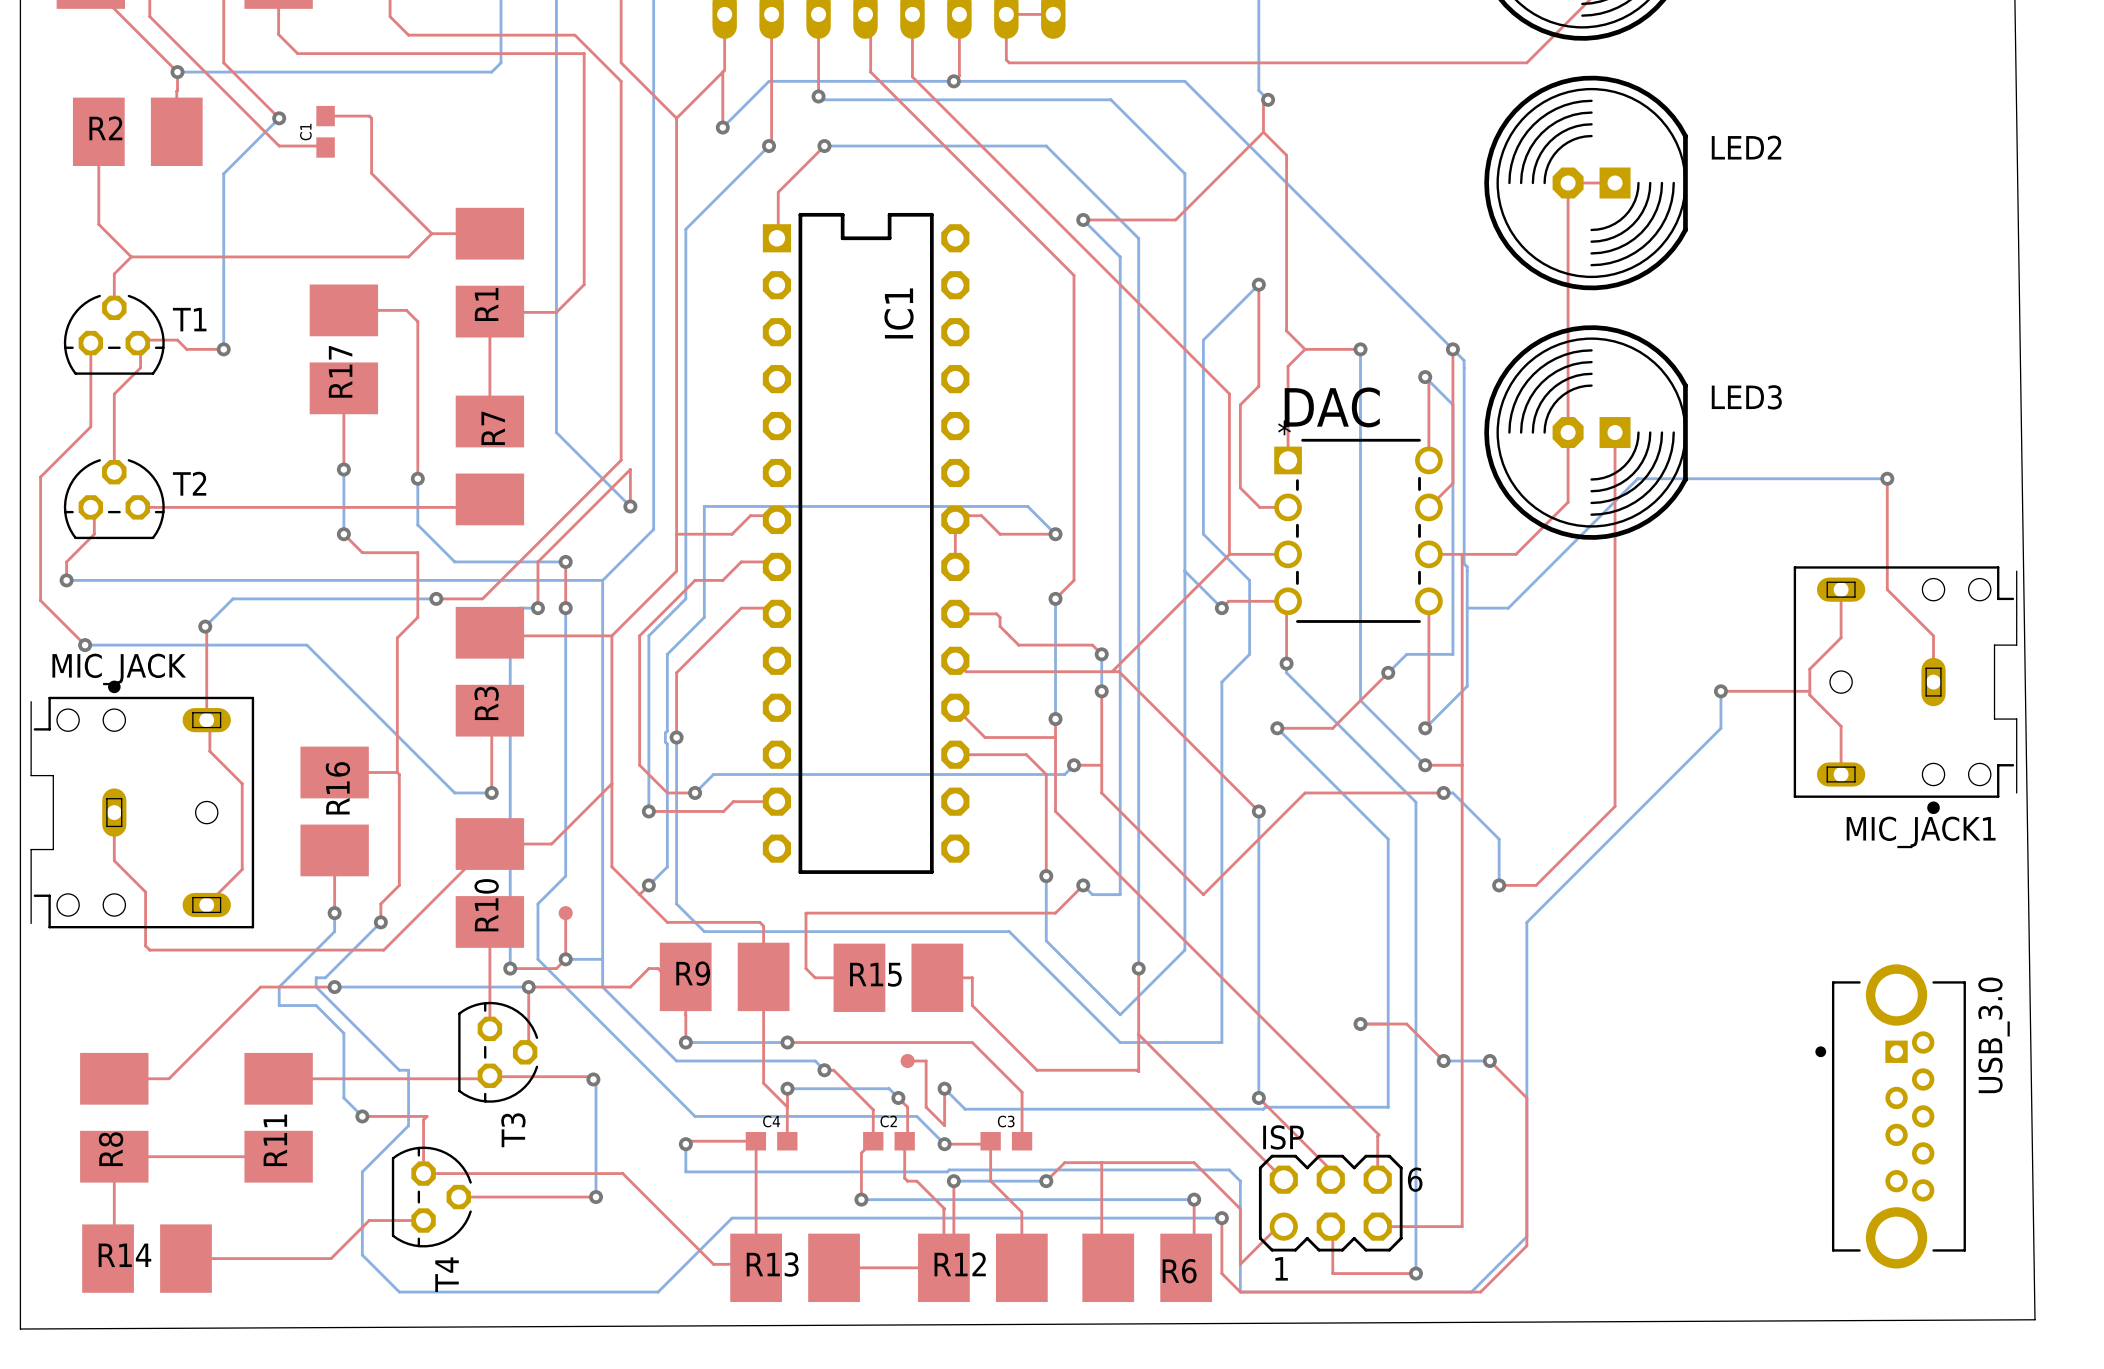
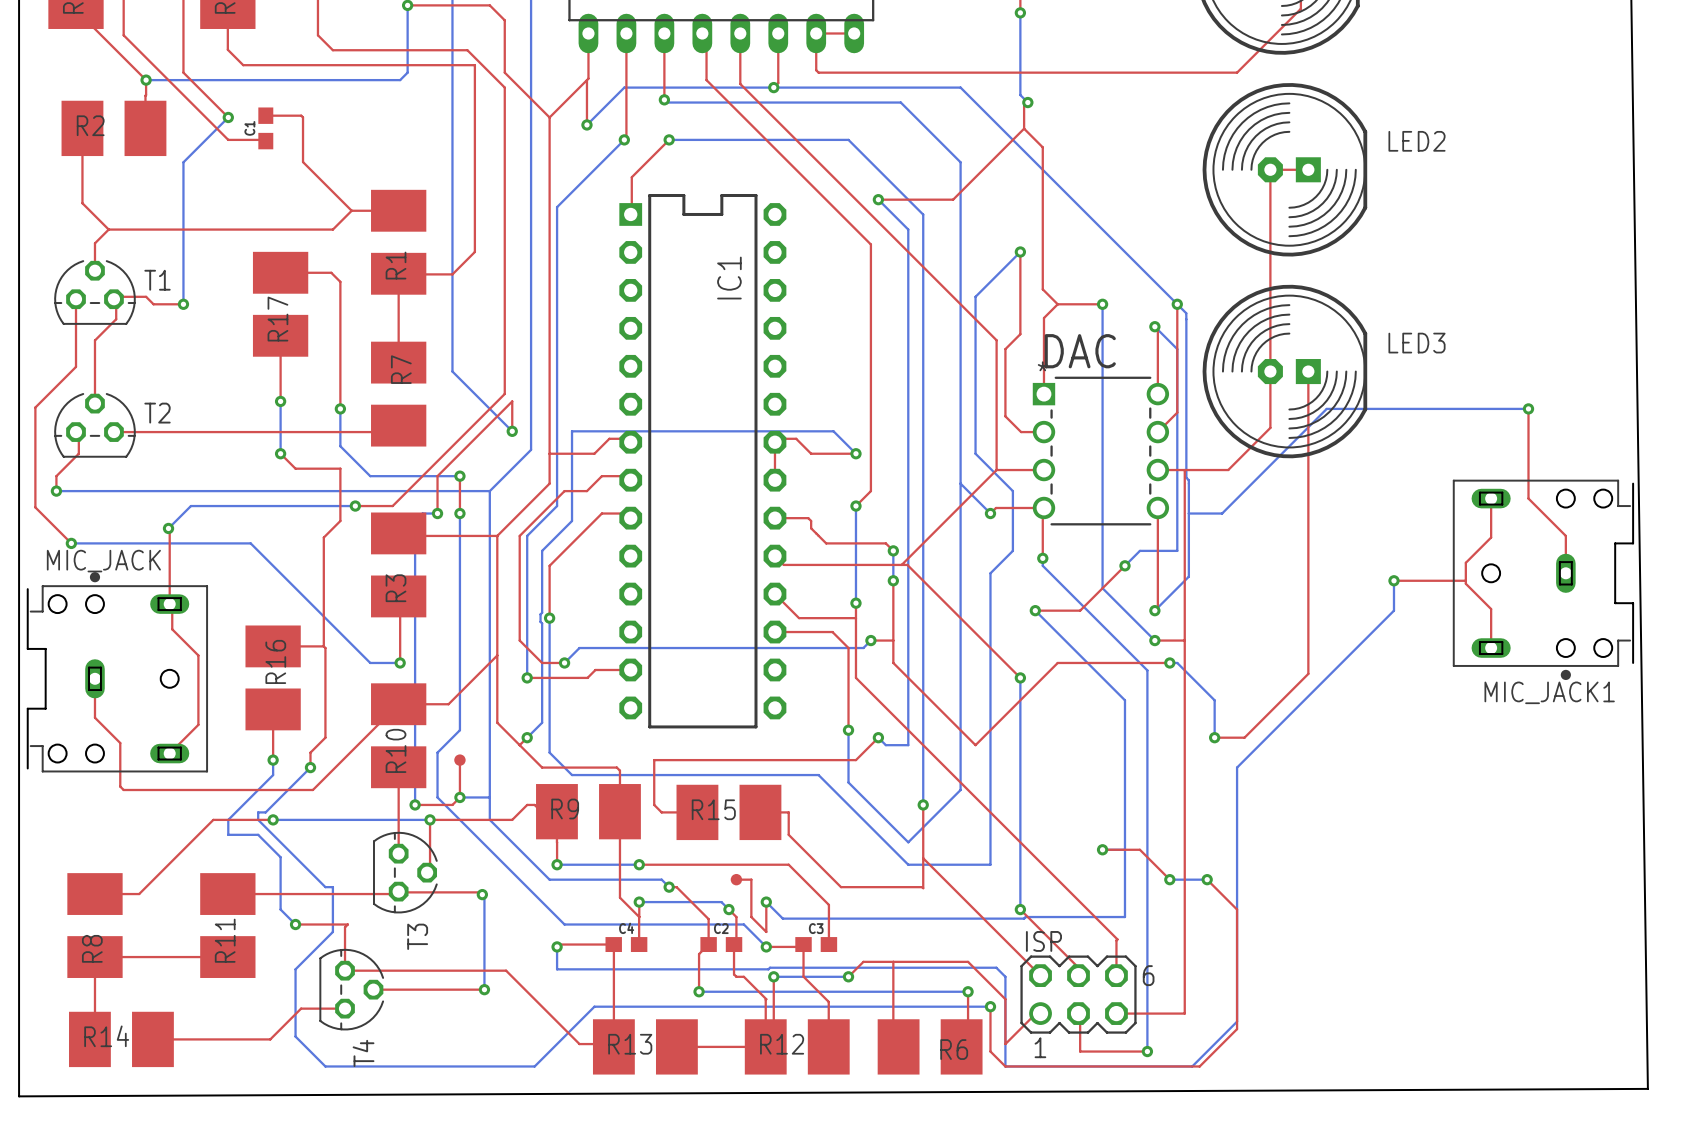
USB_3.0: (1890, 1116) -> none

